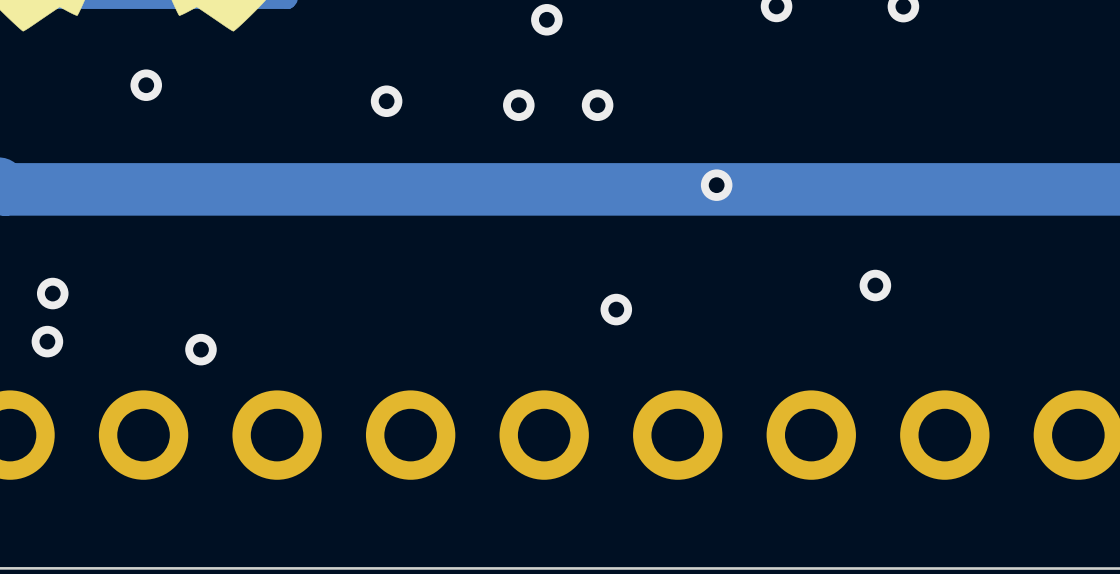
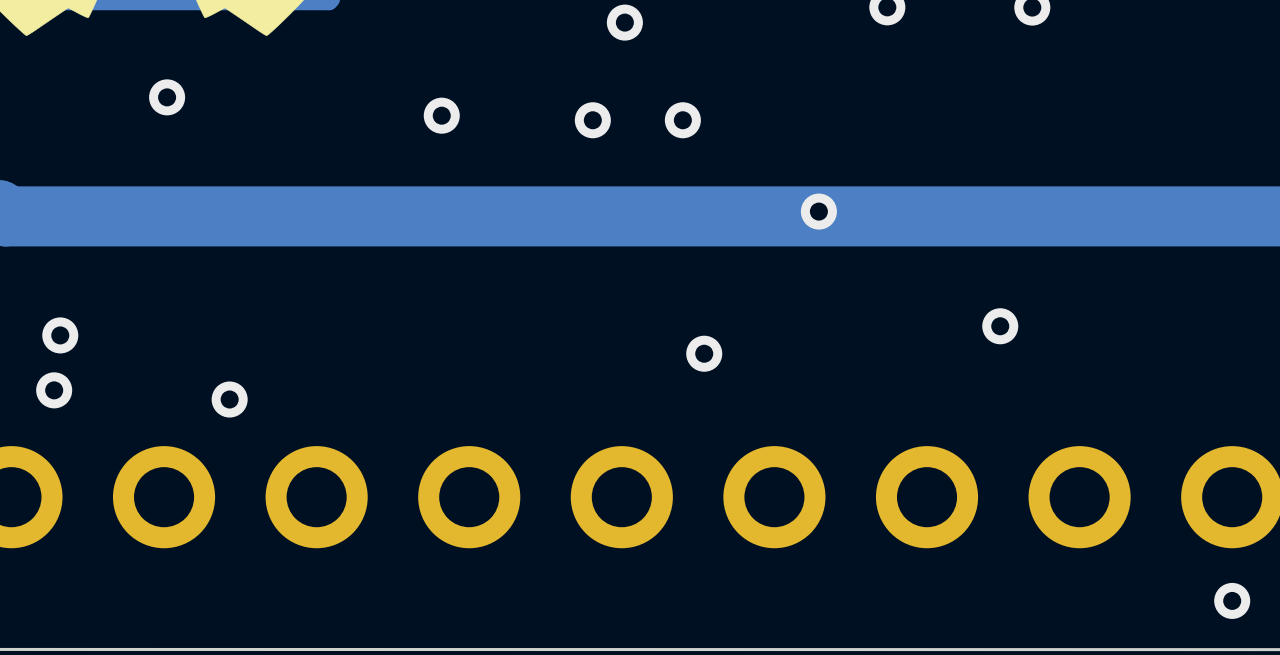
via: none -> (1232, 600)

